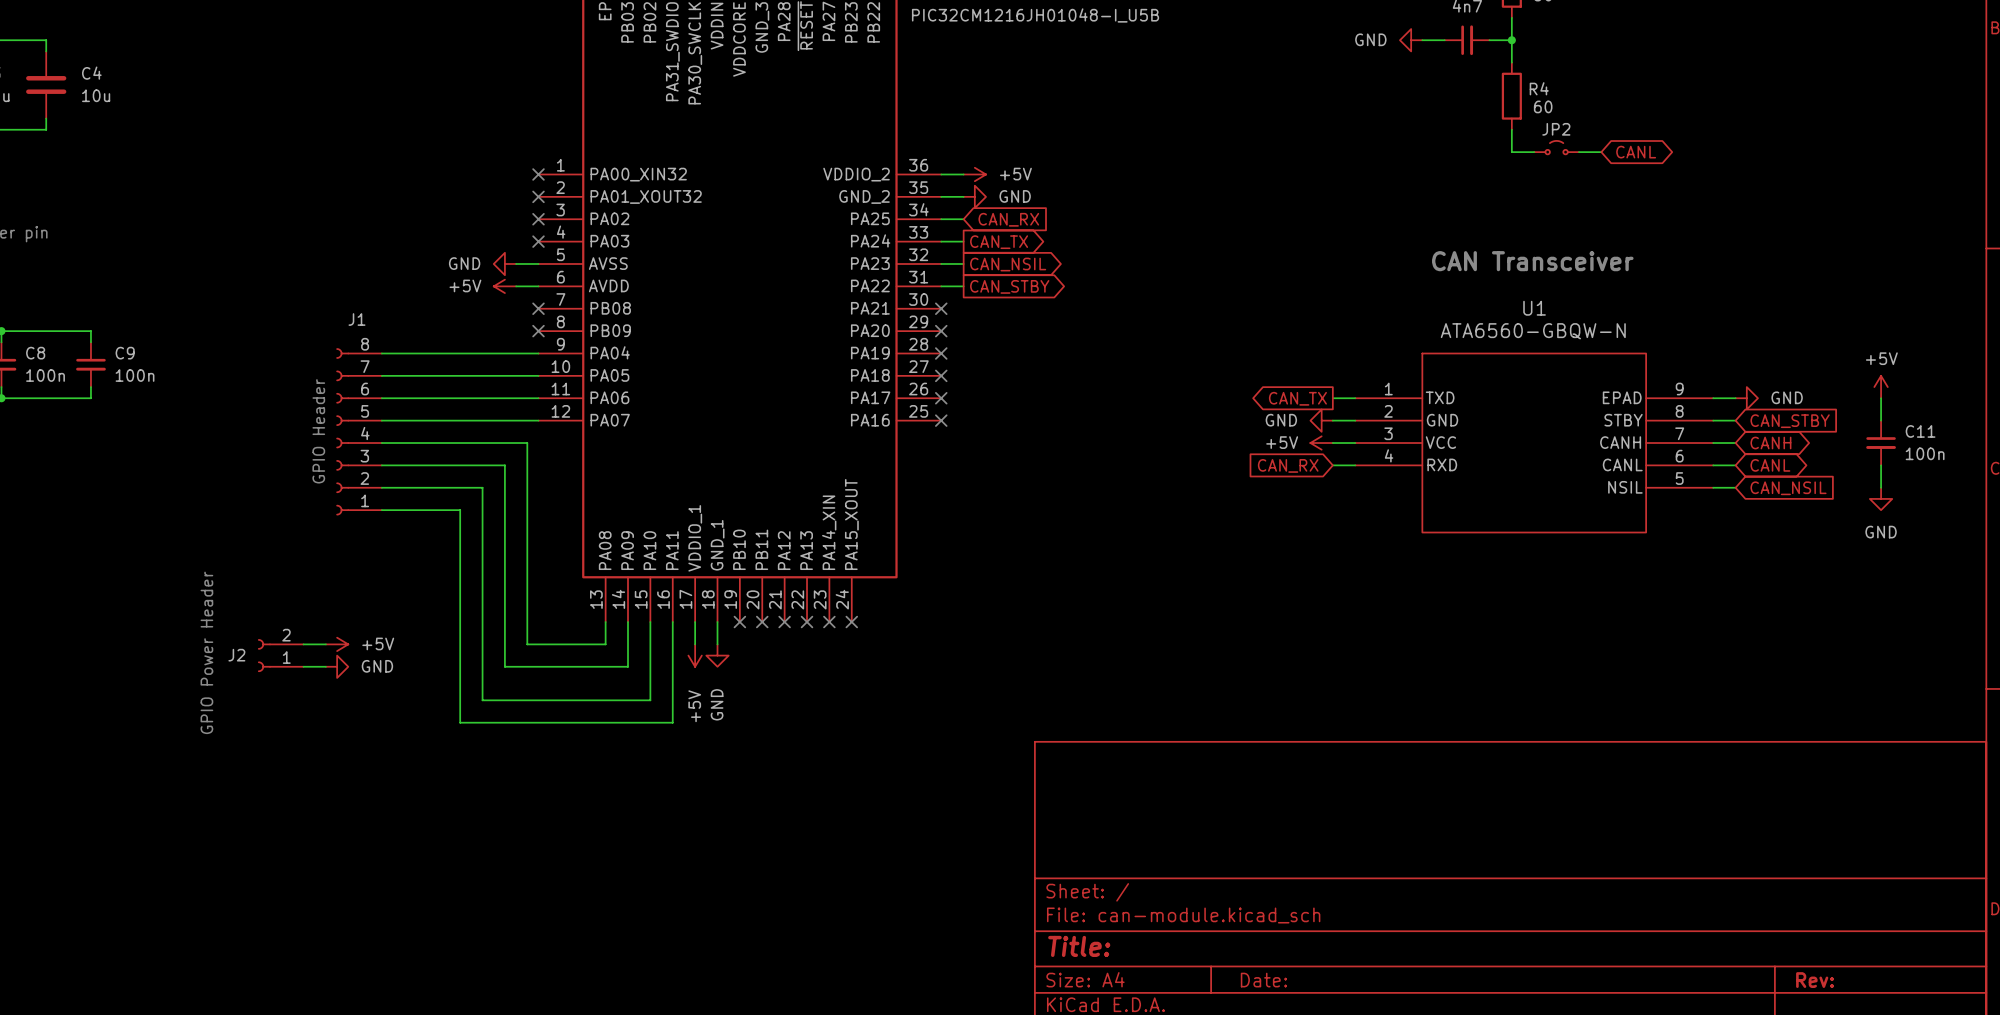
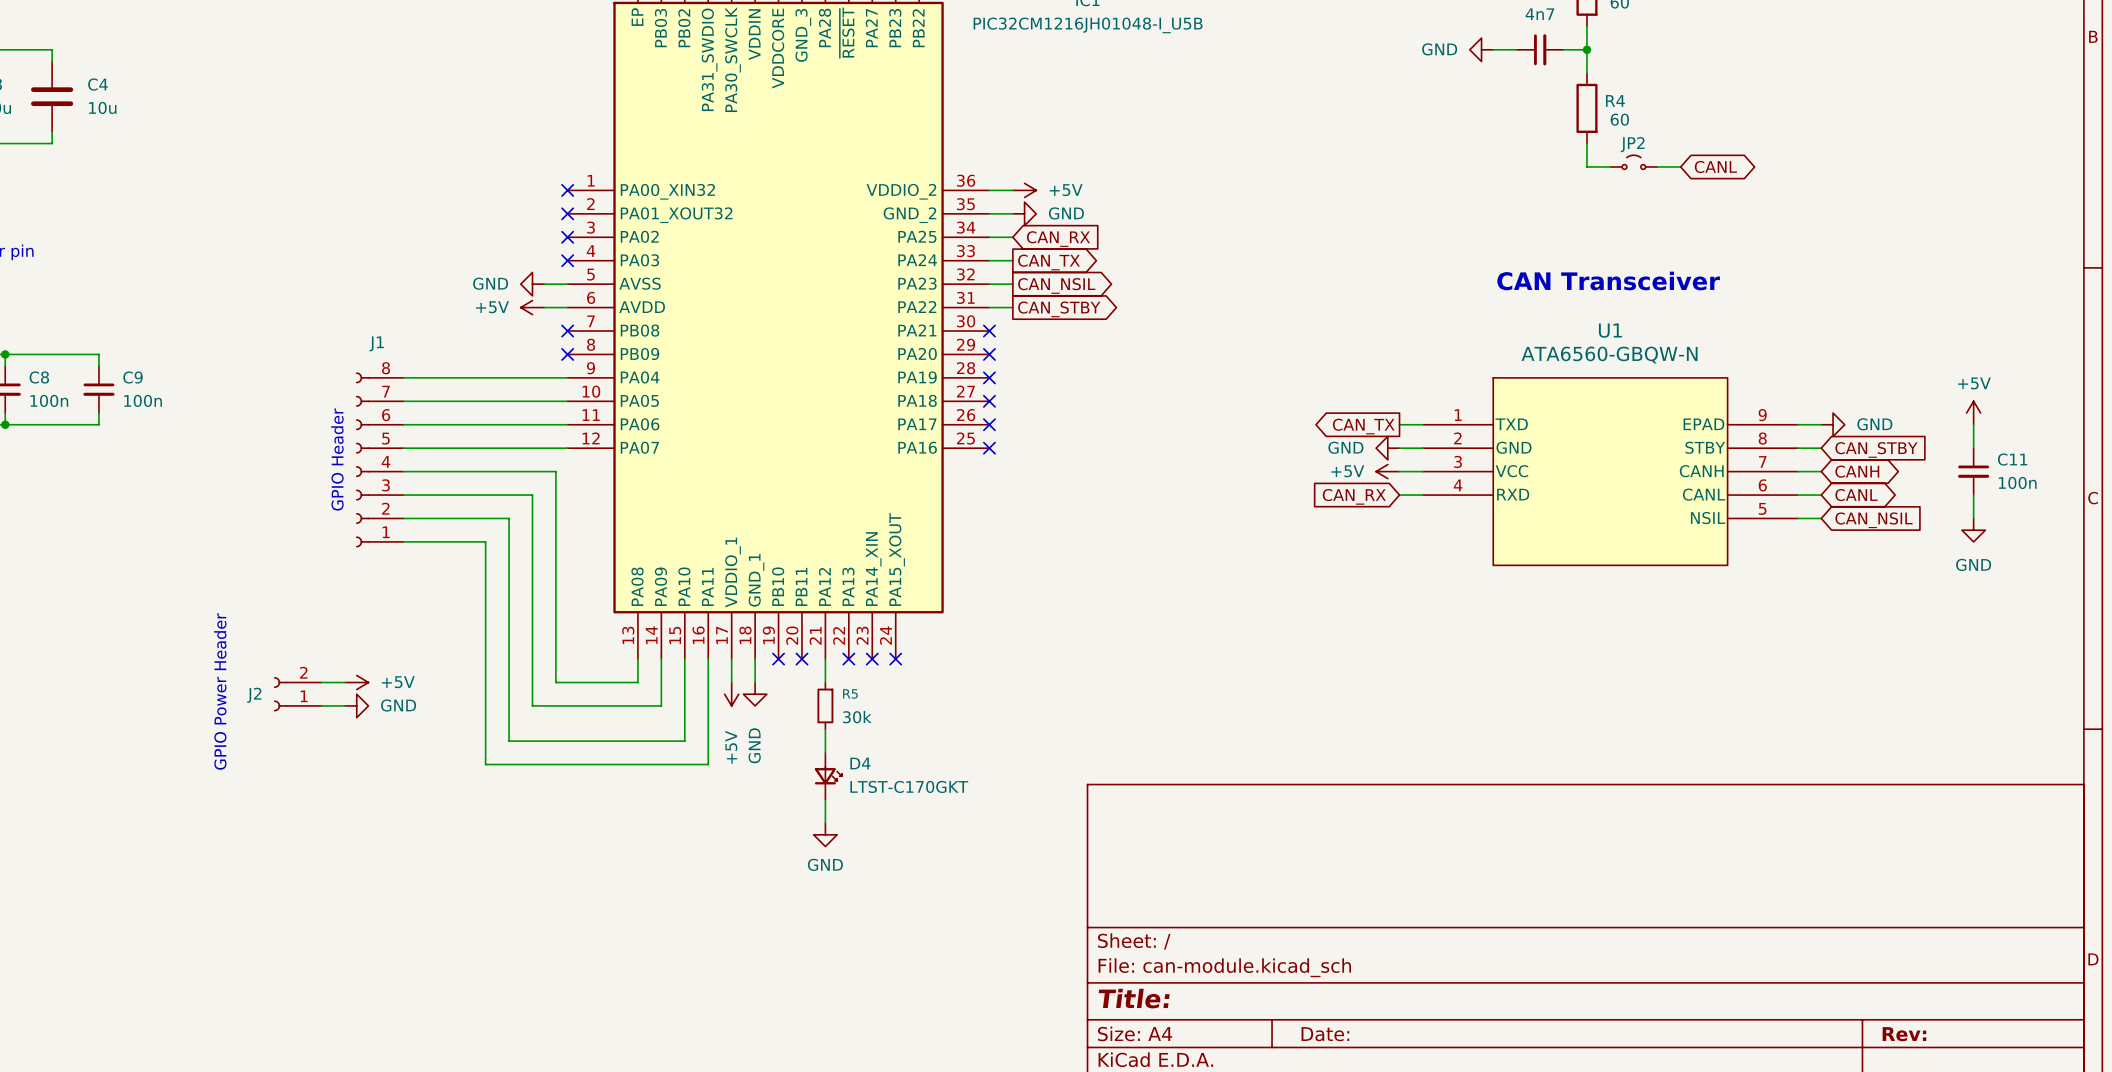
wire: none -> (825, 659) (825, 682)
no-connect mark: (784, 622) -> none
R5: none -> 30k (825, 705)
wire: none -> (825, 729) (825, 752)
D4: none -> LTST-C170GKT (828, 776)
wire: none -> (825, 799) (825, 823)
power symbol: none -> GND (825, 834)

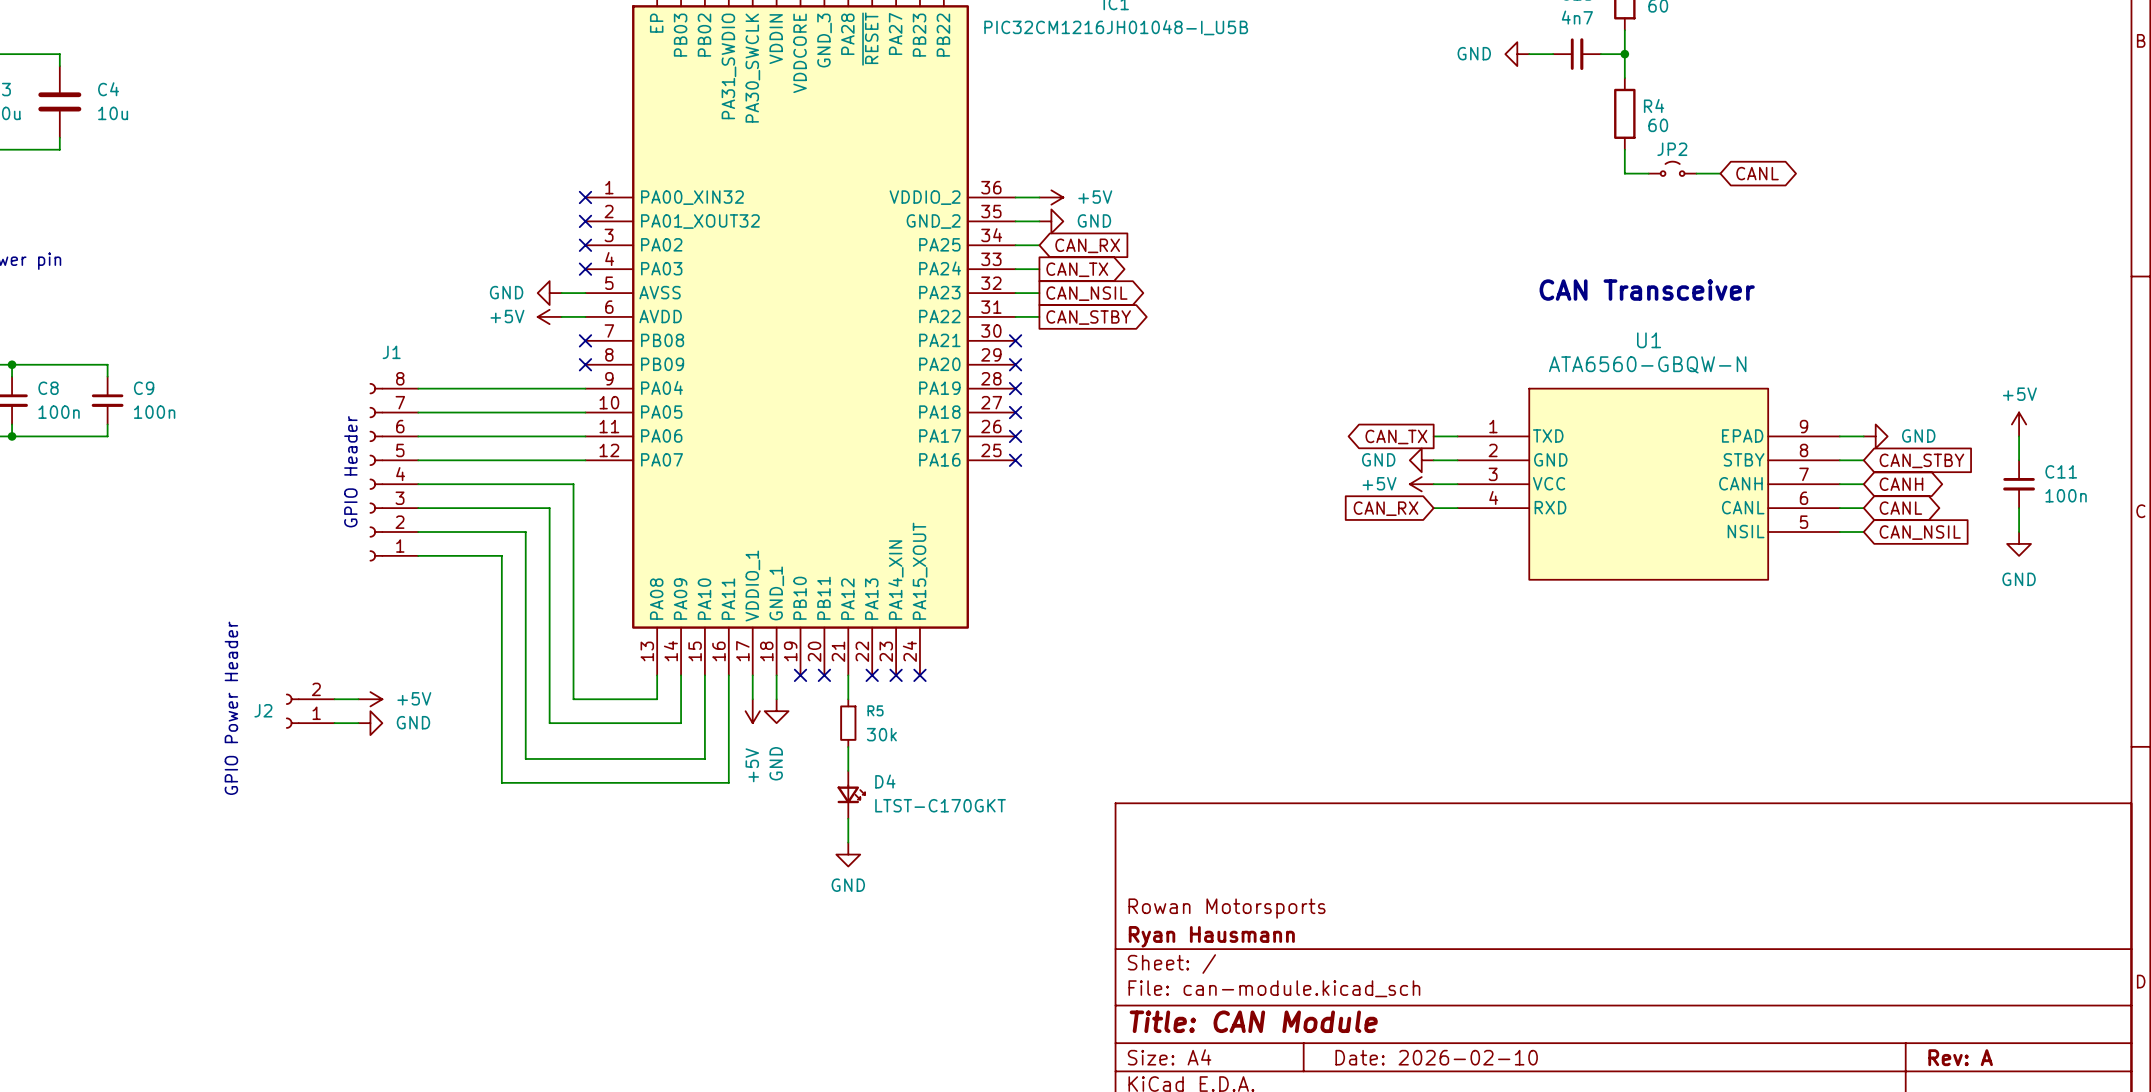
title block: none -> Rowan Motorsports (1227, 908)
title block: none -> Ryan Hausmann (1211, 936)
title block: Title: (1134, 998) -> Title: CAN Module (1253, 1021)
title block: Date: (1325, 1034) -> Date: 2026-02-10 (1436, 1057)
title block: Rev: (1904, 1034) -> Rev: A (1960, 1057)

